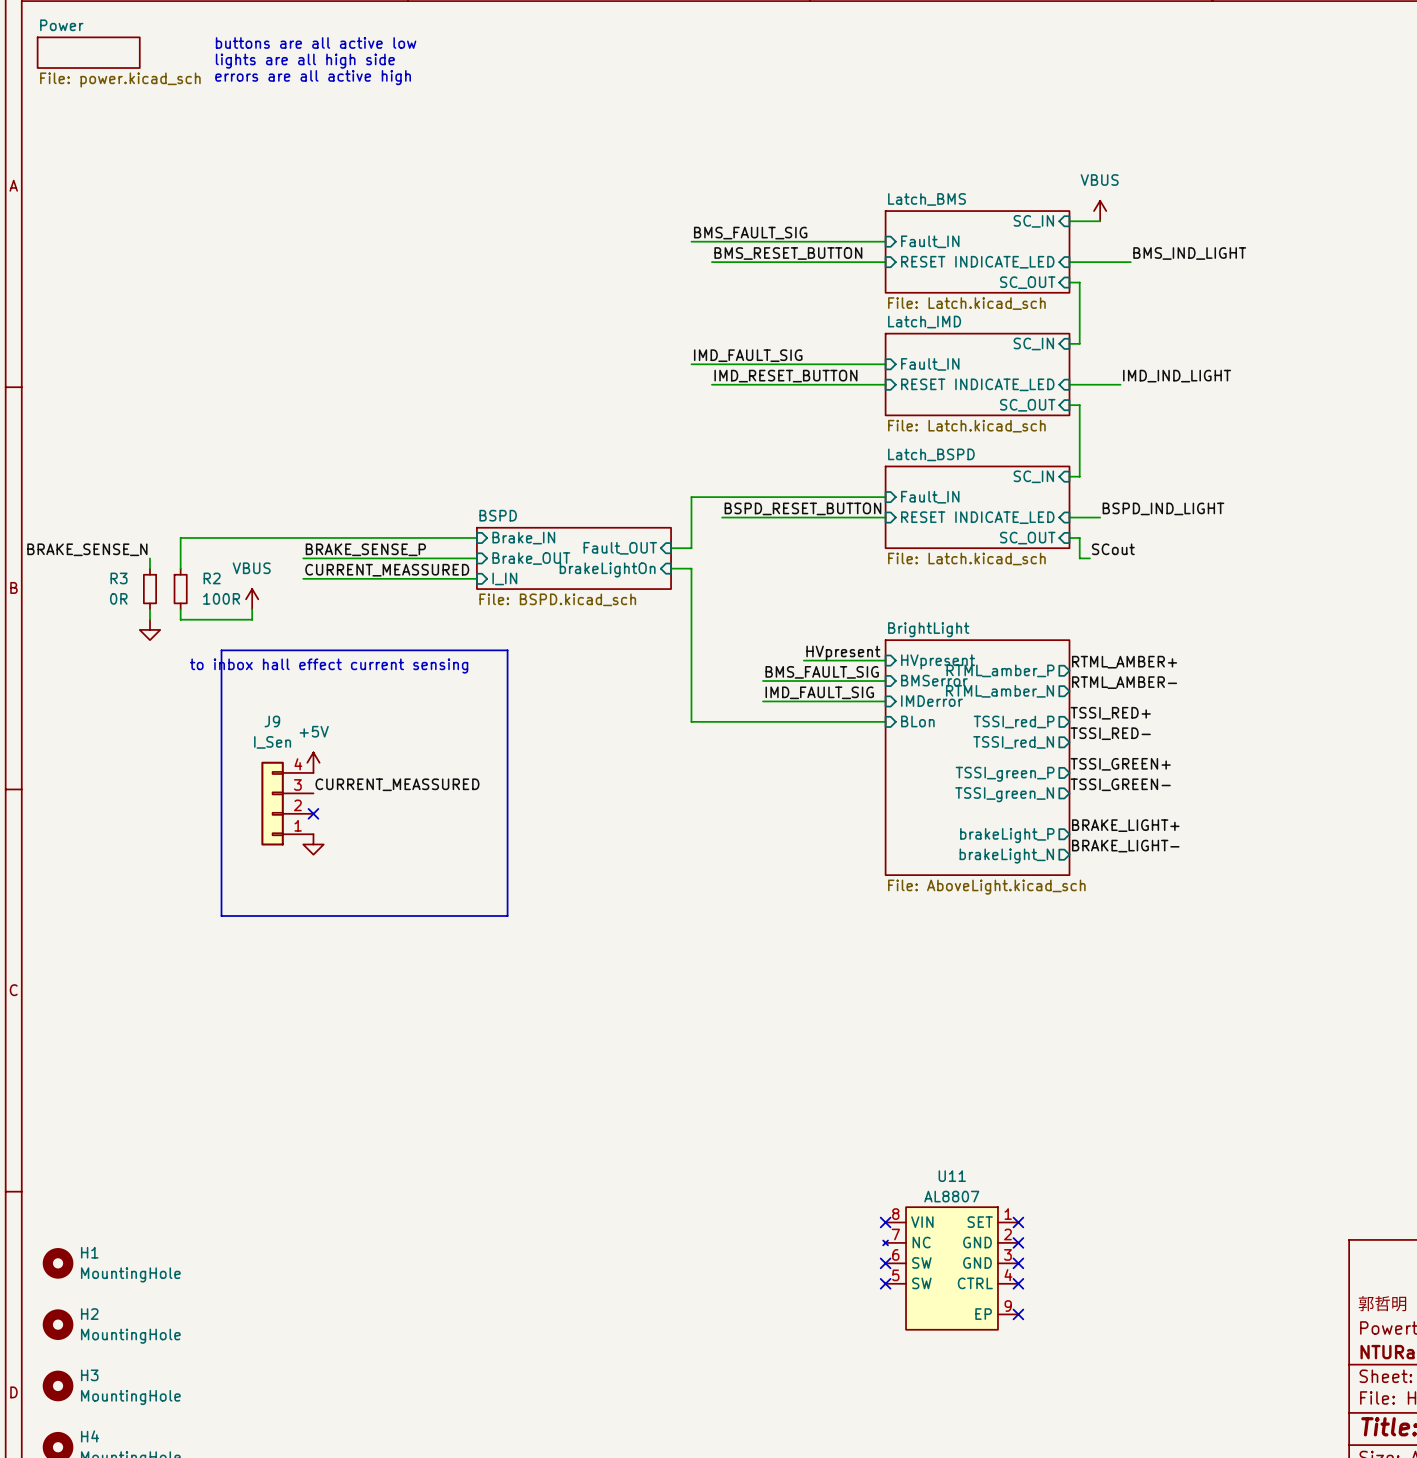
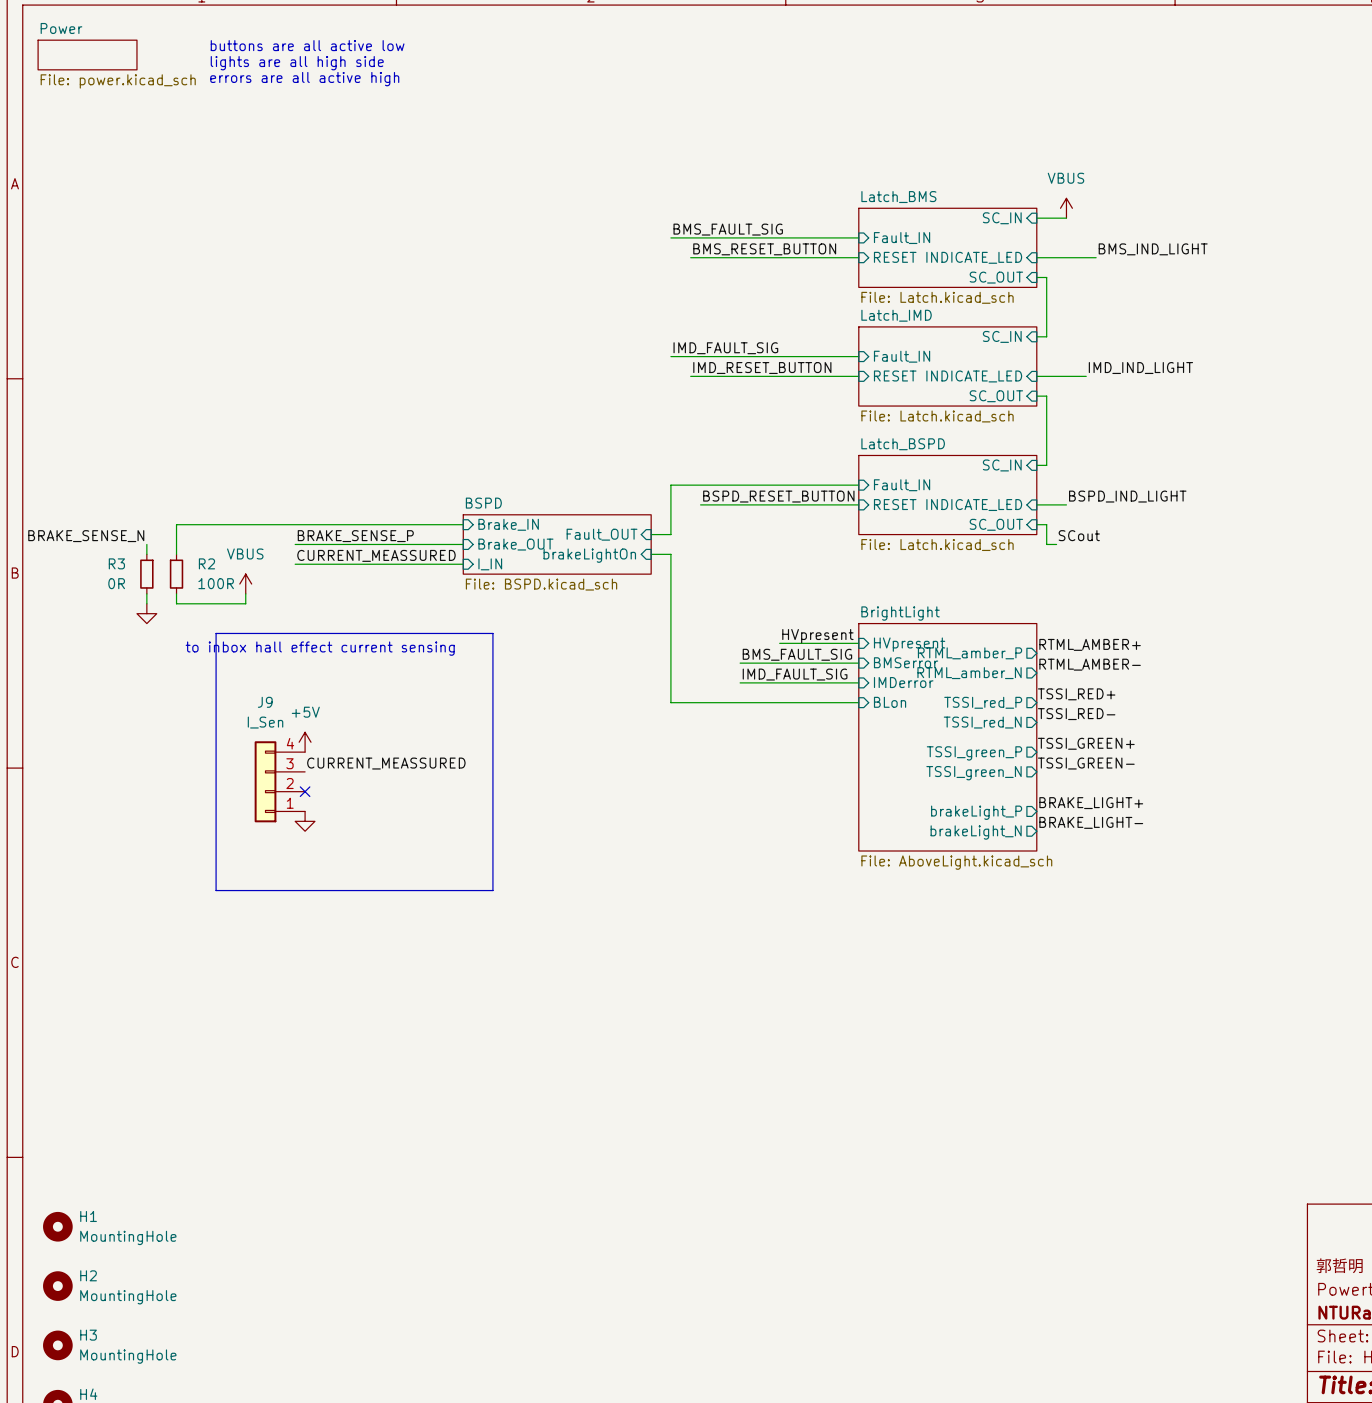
no-connect mark: (885, 1222) -> none
no-connect mark: (1018, 1222) -> none
no-connect mark: (1018, 1242) -> none
no-connect mark: (885, 1263) -> none
no-connect mark: (1018, 1263) -> none
U11: AL8807 (950, 1268) -> none
no-connect mark: (885, 1283) -> none
no-connect mark: (1018, 1283) -> none
no-connect mark: (1018, 1314) -> none

